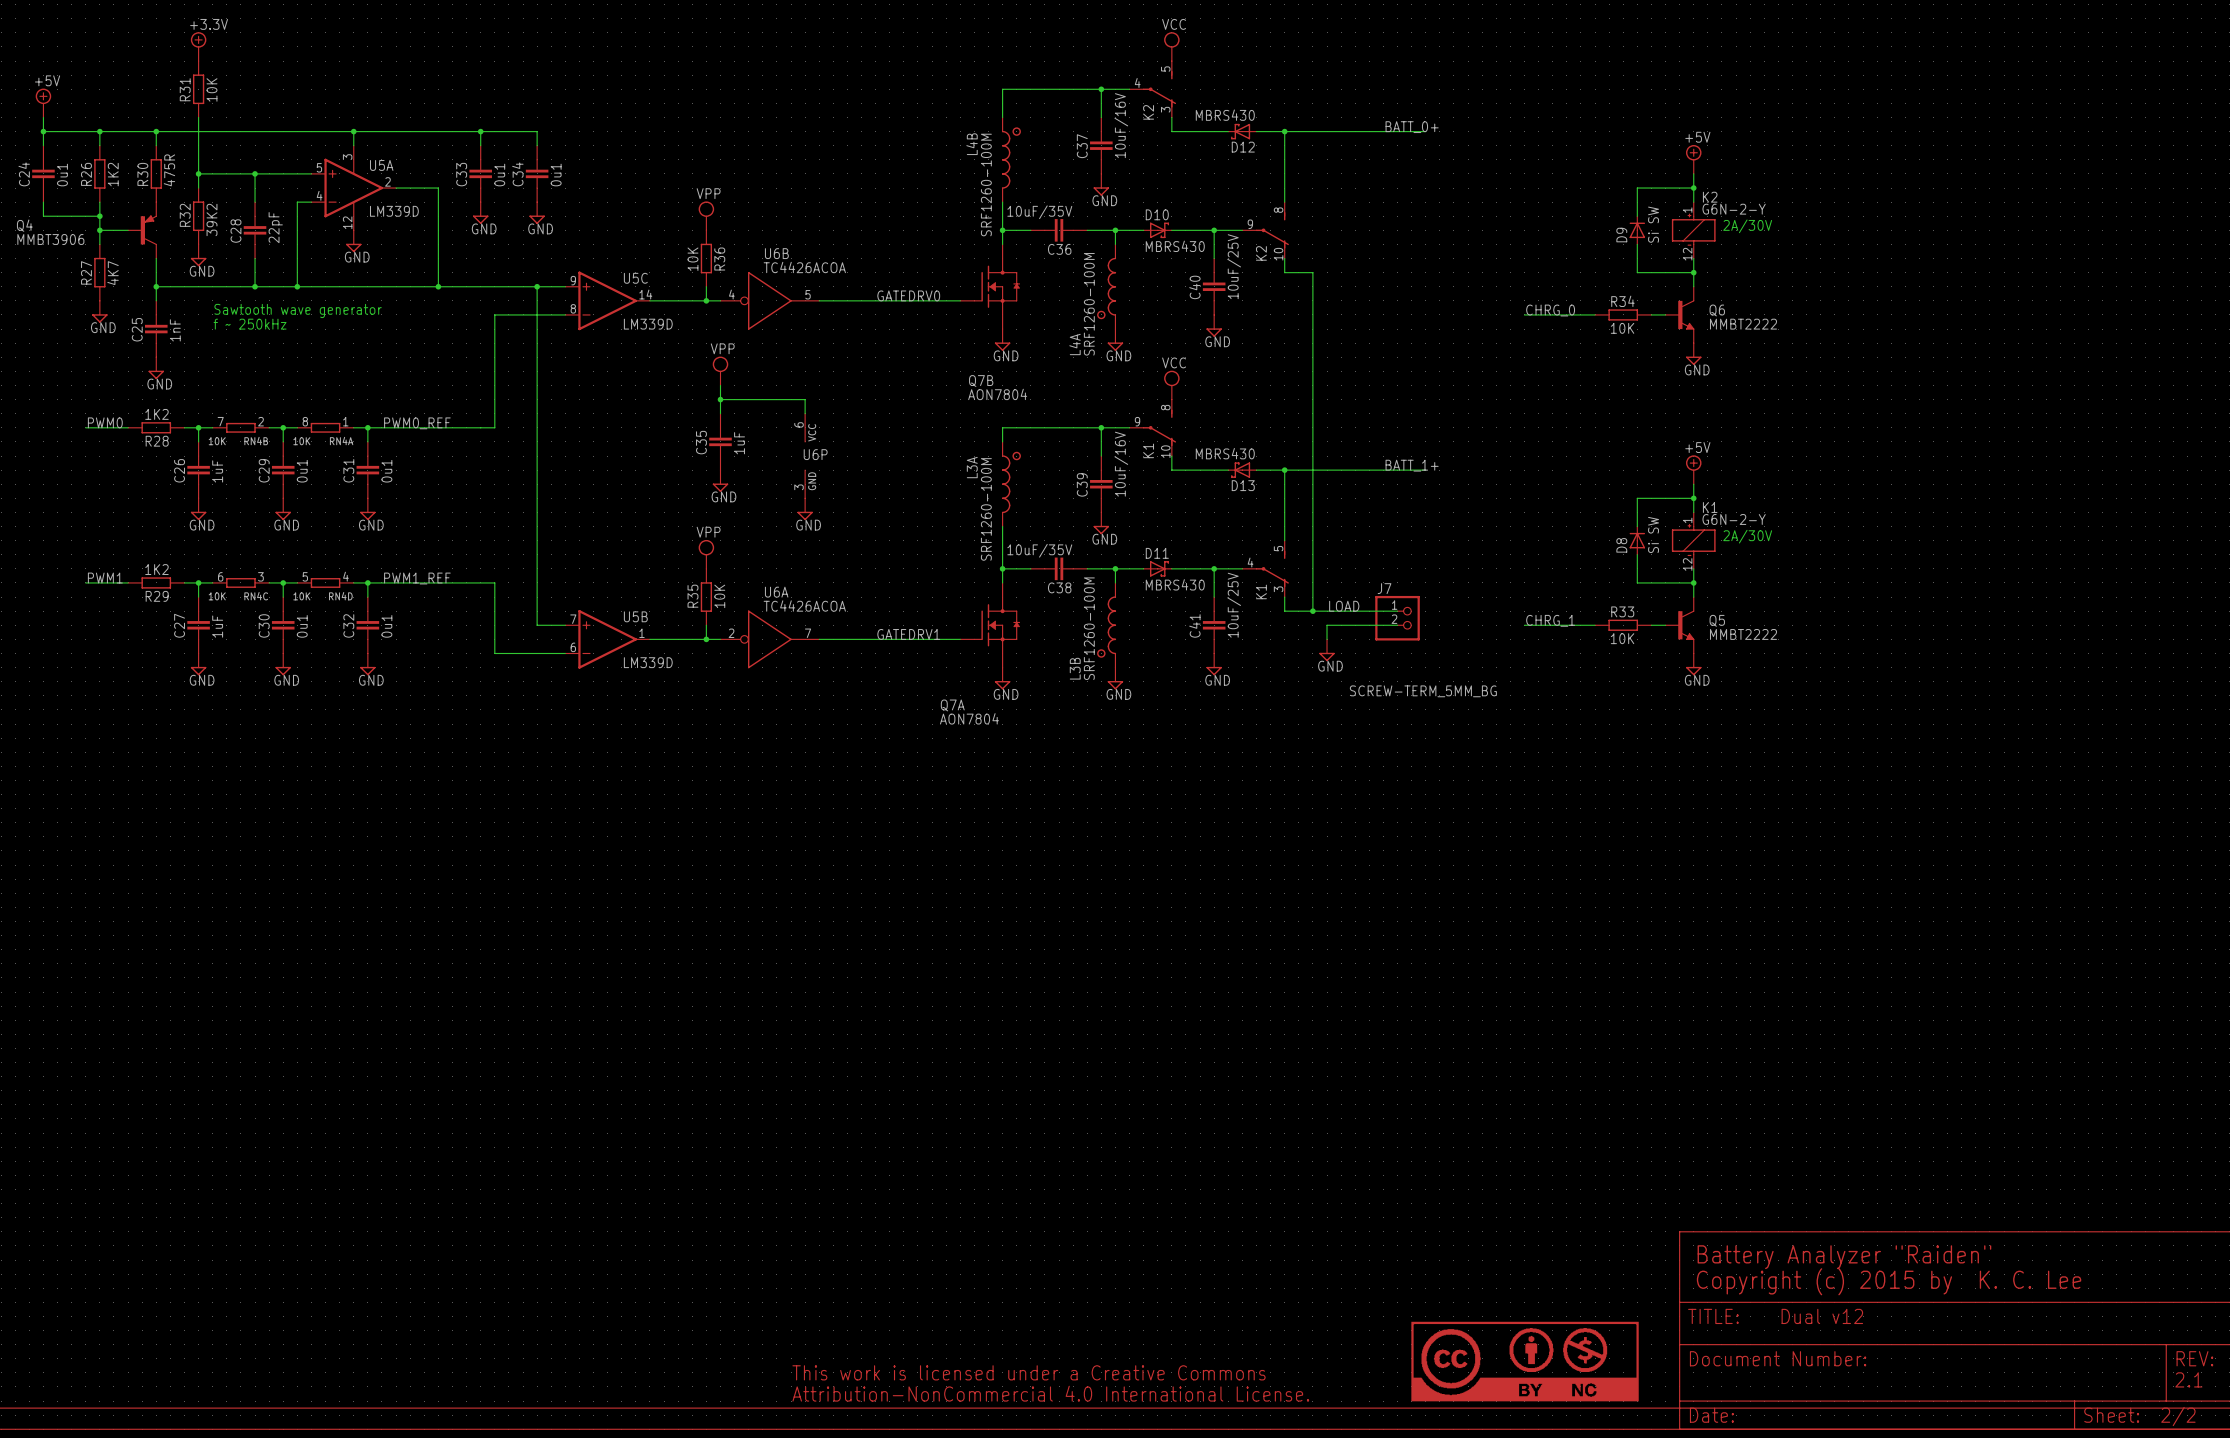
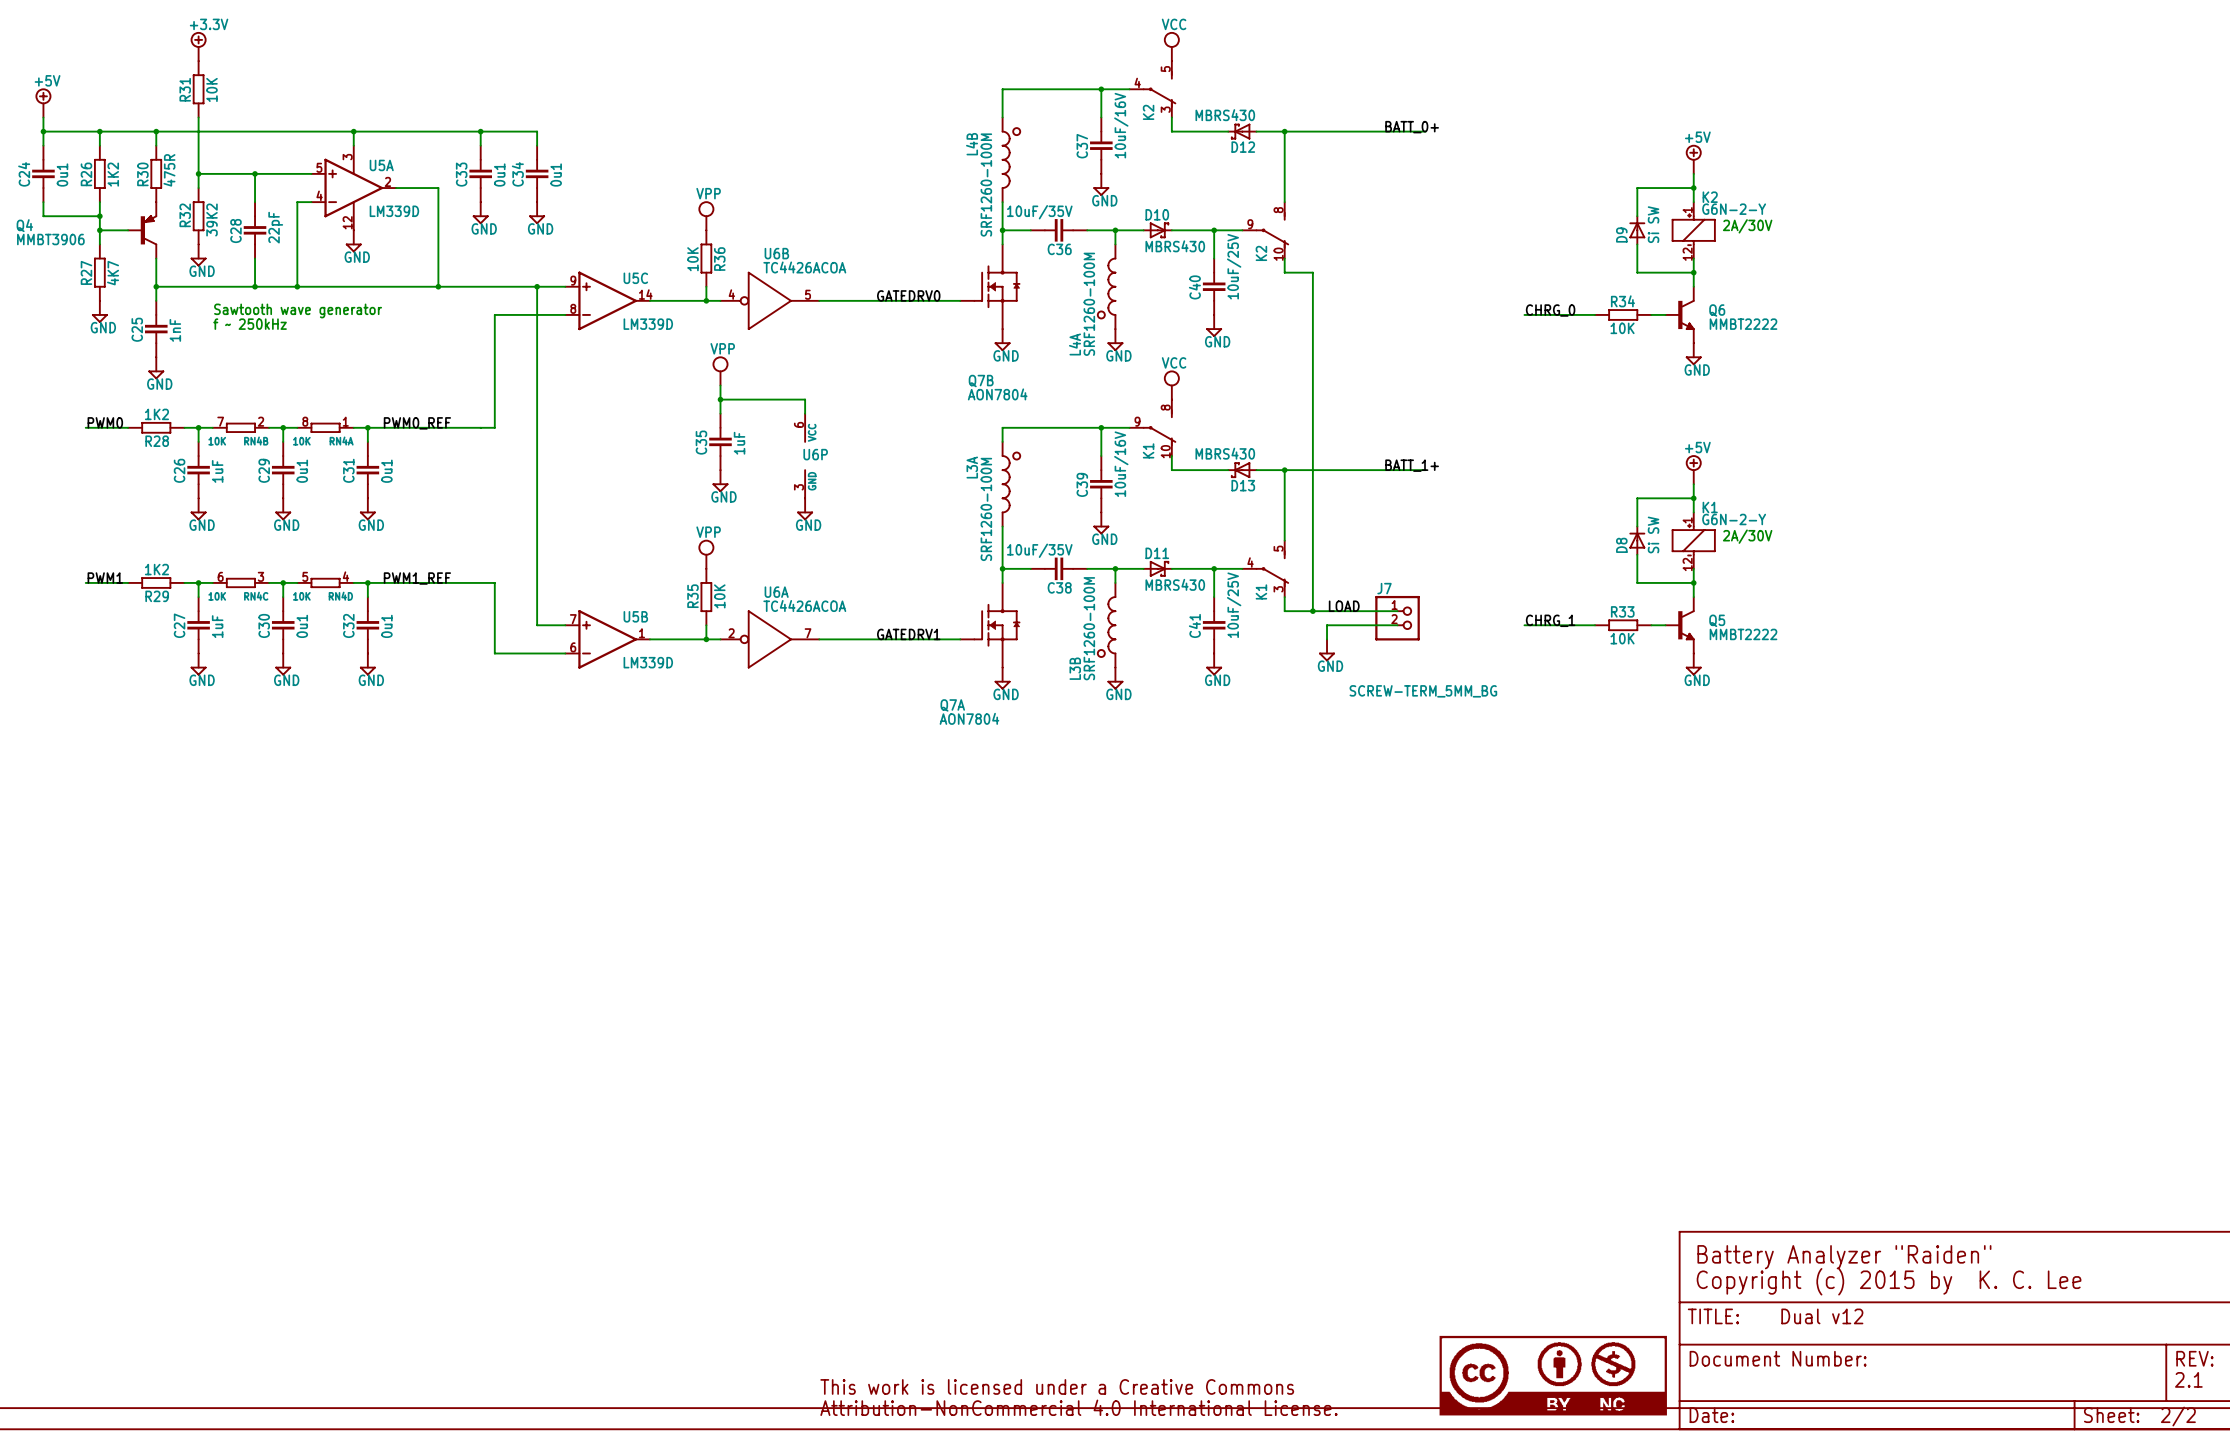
part position: (1525, 1361) -> (1553, 1375)

